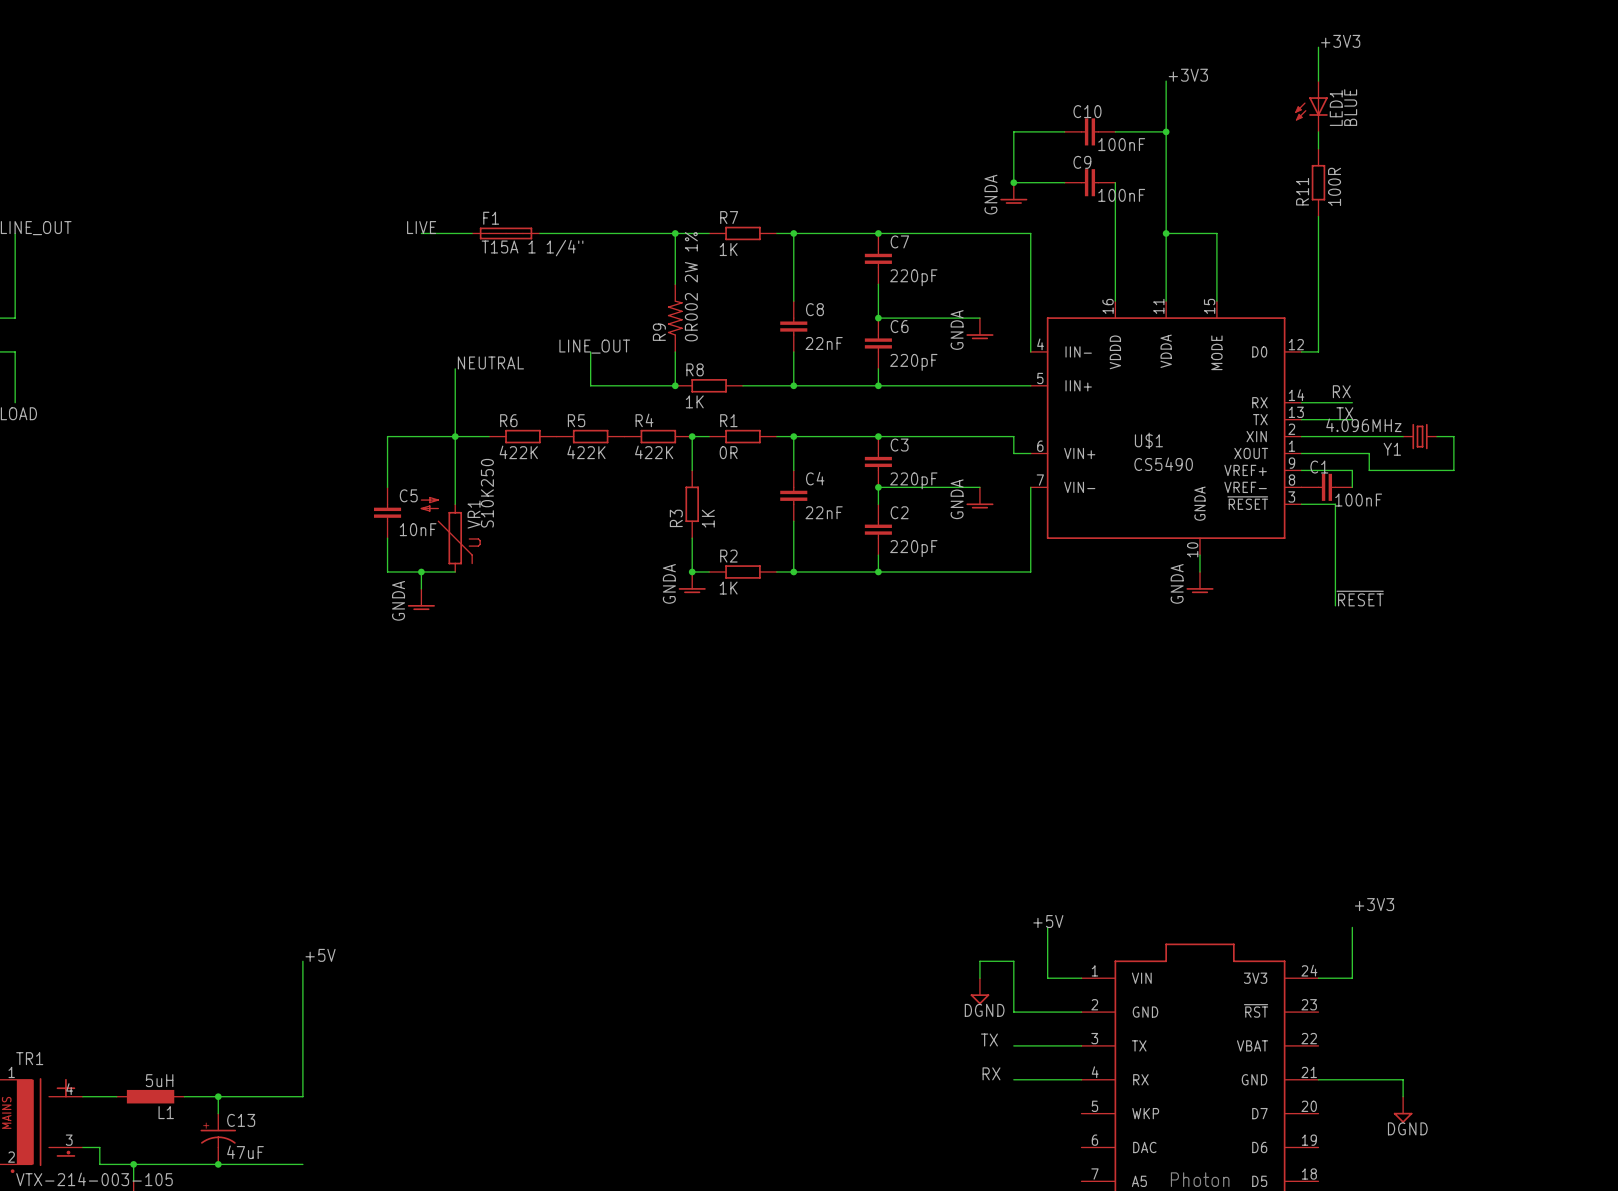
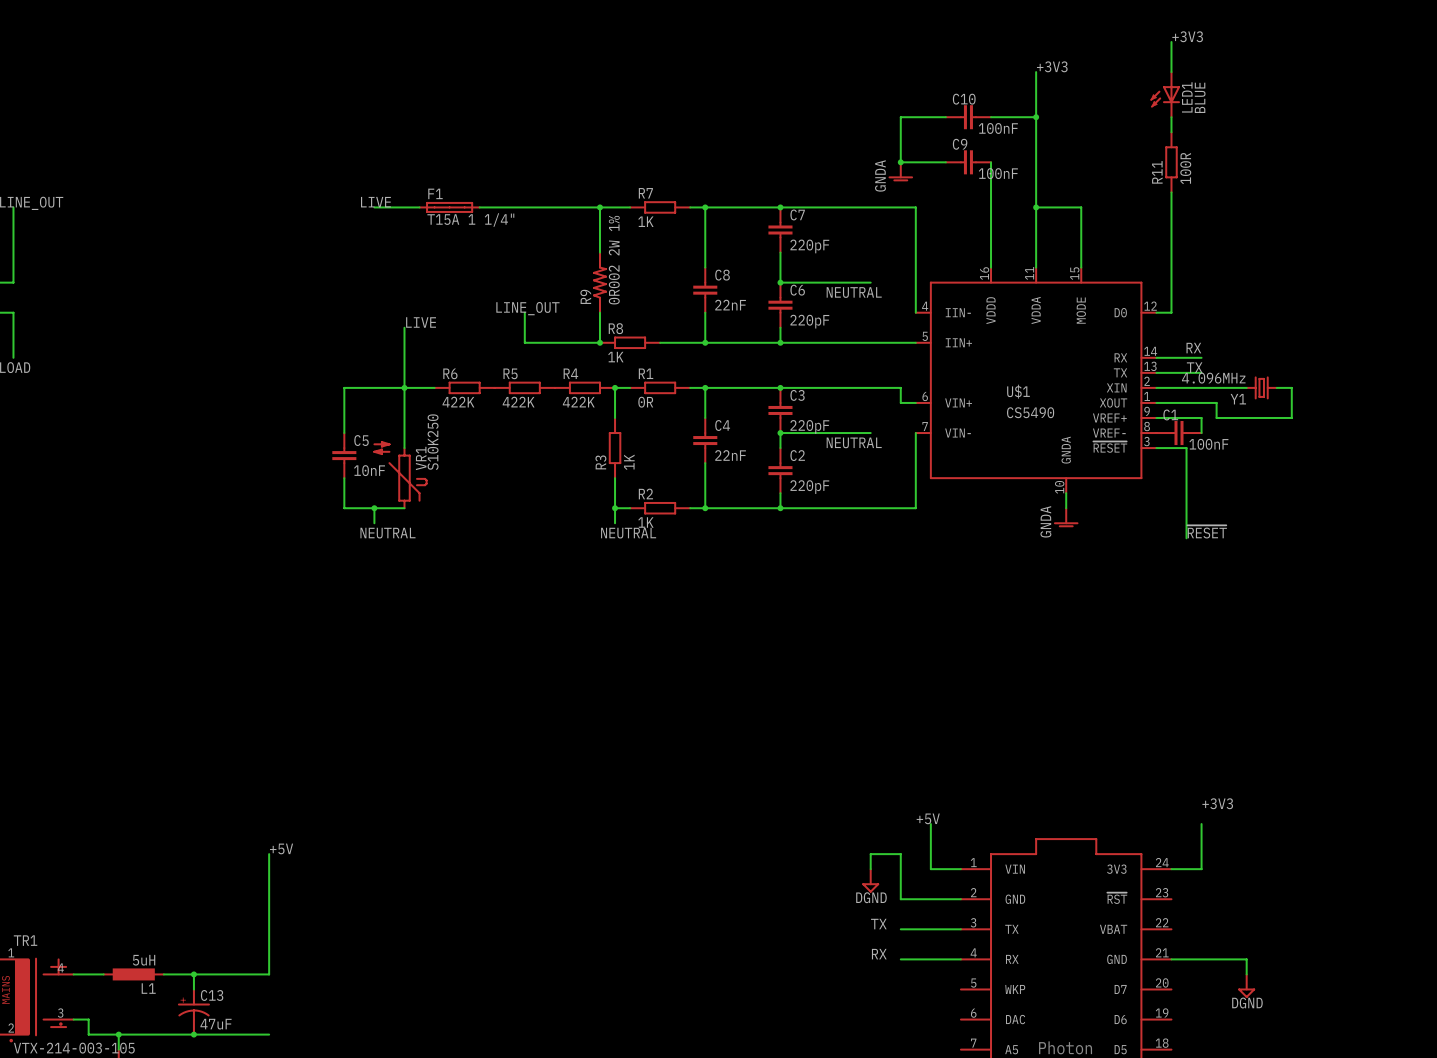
power symbol: GNDA (979, 328) -> none
label: none -> NEUTRAL (854, 292)
label: NEUTRAL (490, 362) -> LIVE (421, 322)
power symbol: GNDA (979, 497) -> none
label: none -> NEUTRAL (854, 442)
power symbol: GNDA (692, 582) -> none
power symbol: GNDA (421, 599) -> none
label: none -> NEUTRAL (387, 533)
label: none -> NEUTRAL (628, 533)

